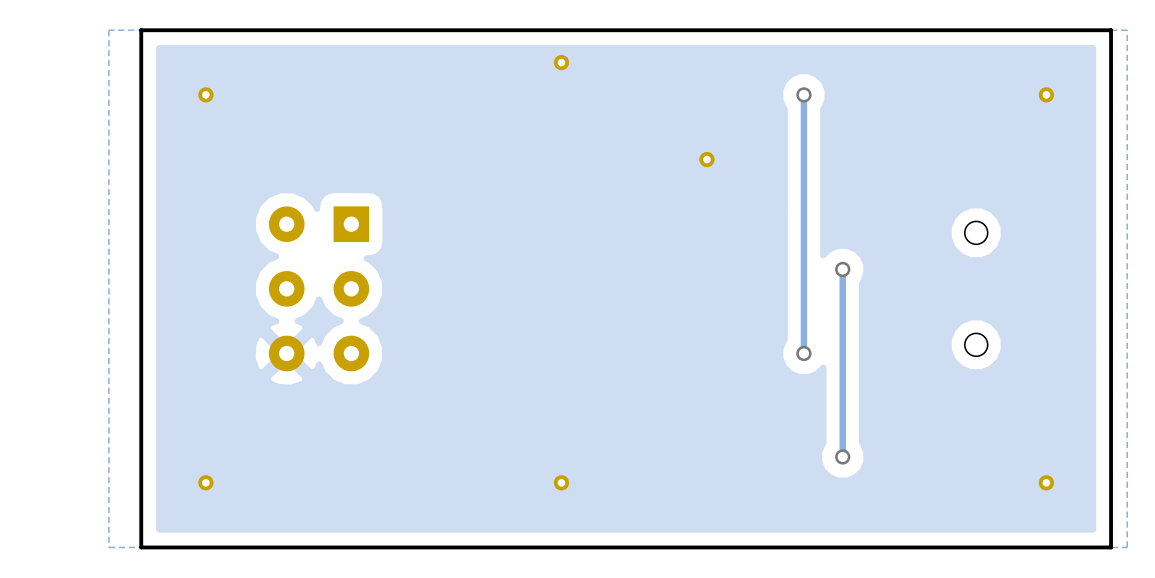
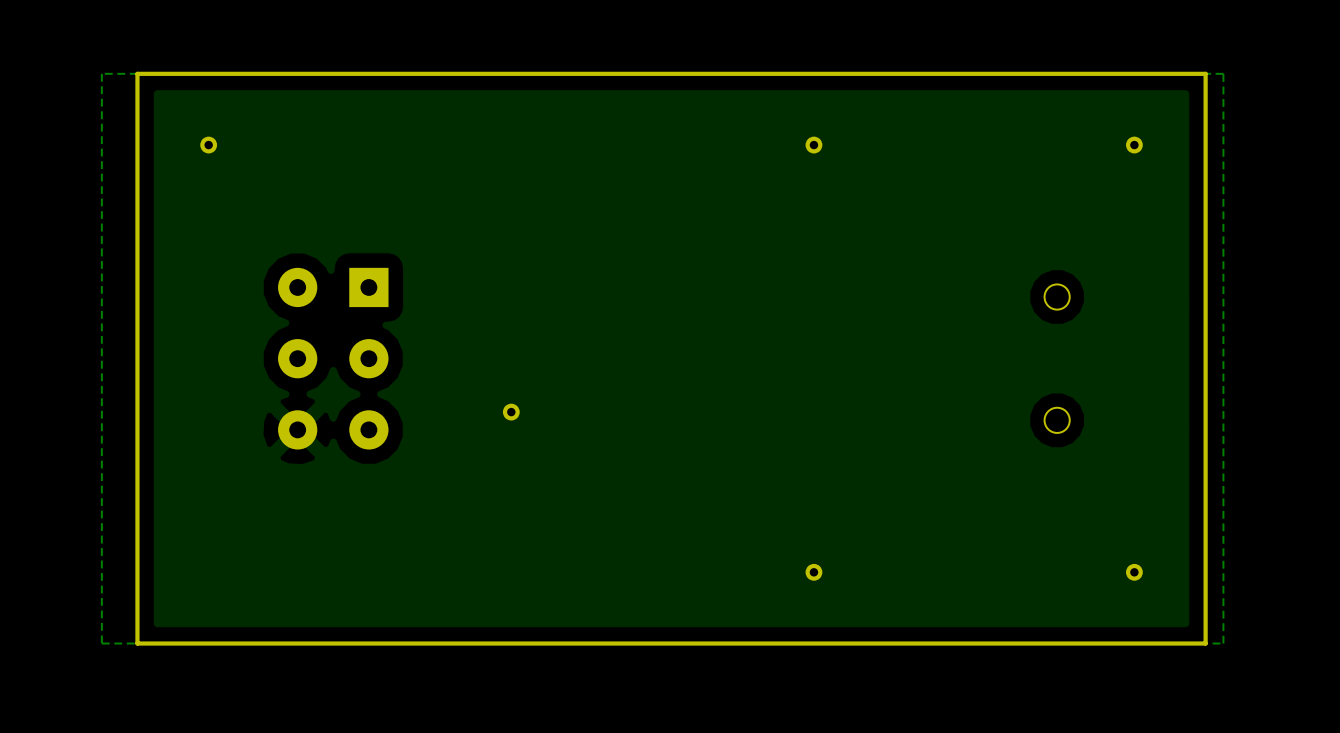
part: (561, 62) -> none
track: (803, 94) (803, 353) -> none
via: (803, 94) -> none
part position: (706, 159) -> (813, 145)
track: (842, 269) (842, 456) -> none
via: (842, 269) -> none
part: none -> (511, 412)
via: (803, 353) -> none
via: (842, 456) -> none
part: (205, 482) -> none
part: (561, 482) -> none
part: none -> (813, 572)

